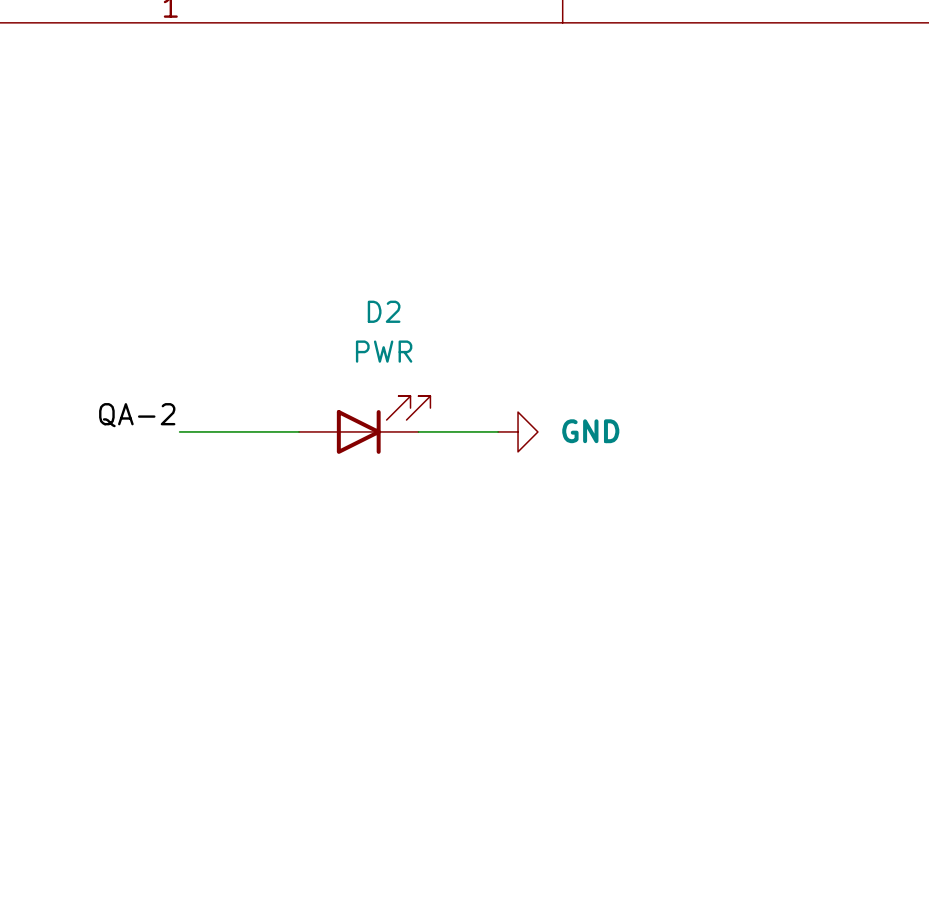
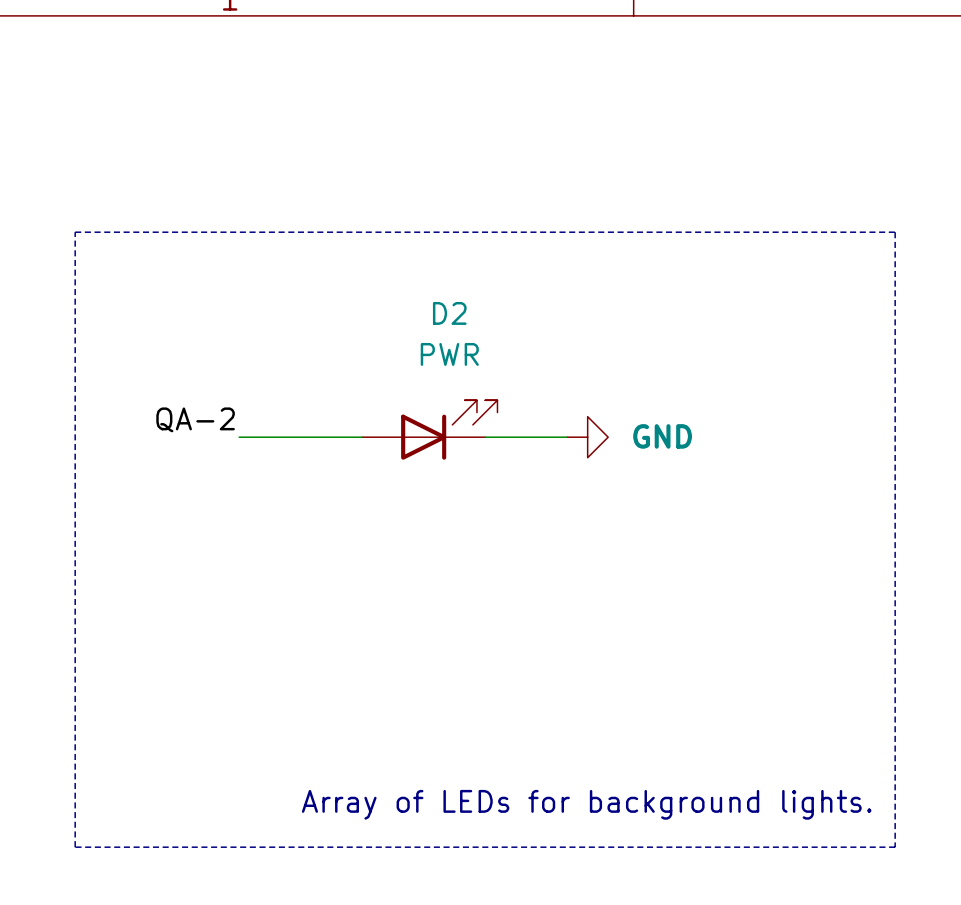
line: none -> (75, 232) (895, 232) (895, 847) (75, 847) (75, 232)
text: none -> Array of LEDs for background lights. (586, 804)

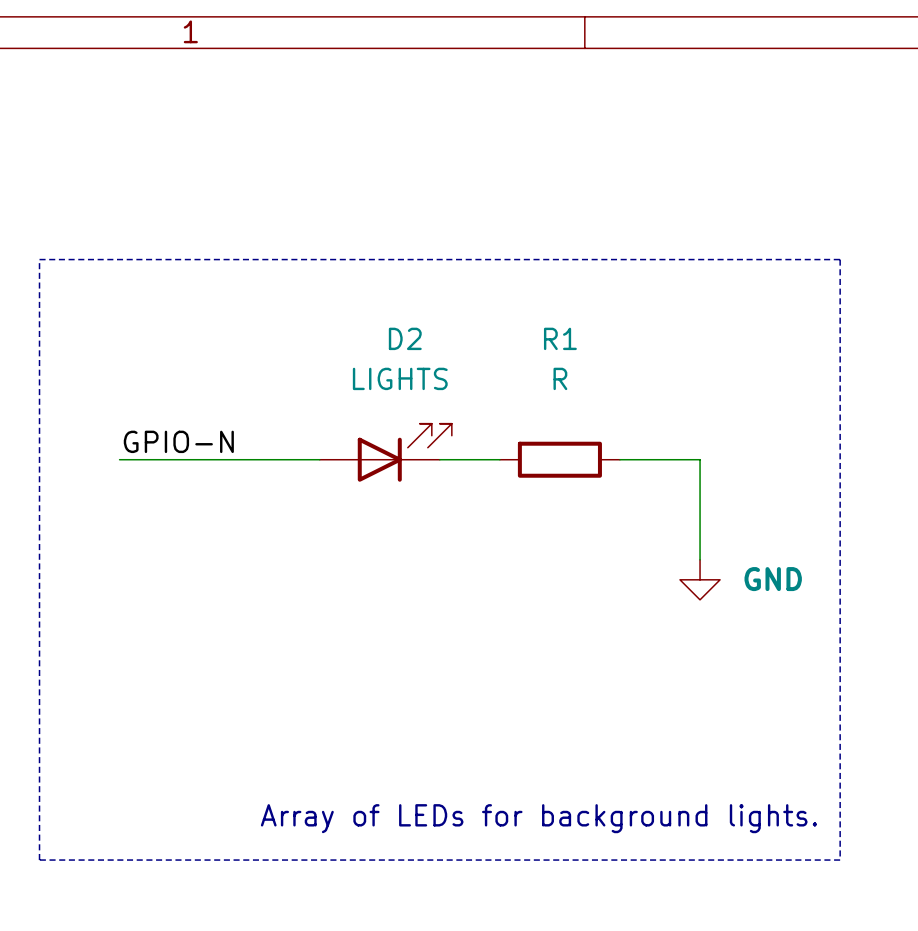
D2 value: PWR (449, 354) -> LIGHTS (400, 378)
label: none -> GPIO-N (178, 441)
label: QA-2 (195, 419) -> none
wire: none -> (119, 459) (199, 459)
power symbol rotation: 0° (587, 437) -> 90° clockwise (700, 579)
power symbol position: GND (587, 437) -> GND (700, 579)
R1: none -> R (559, 459)
wire: none -> (619, 459) (700, 459) (700, 559)

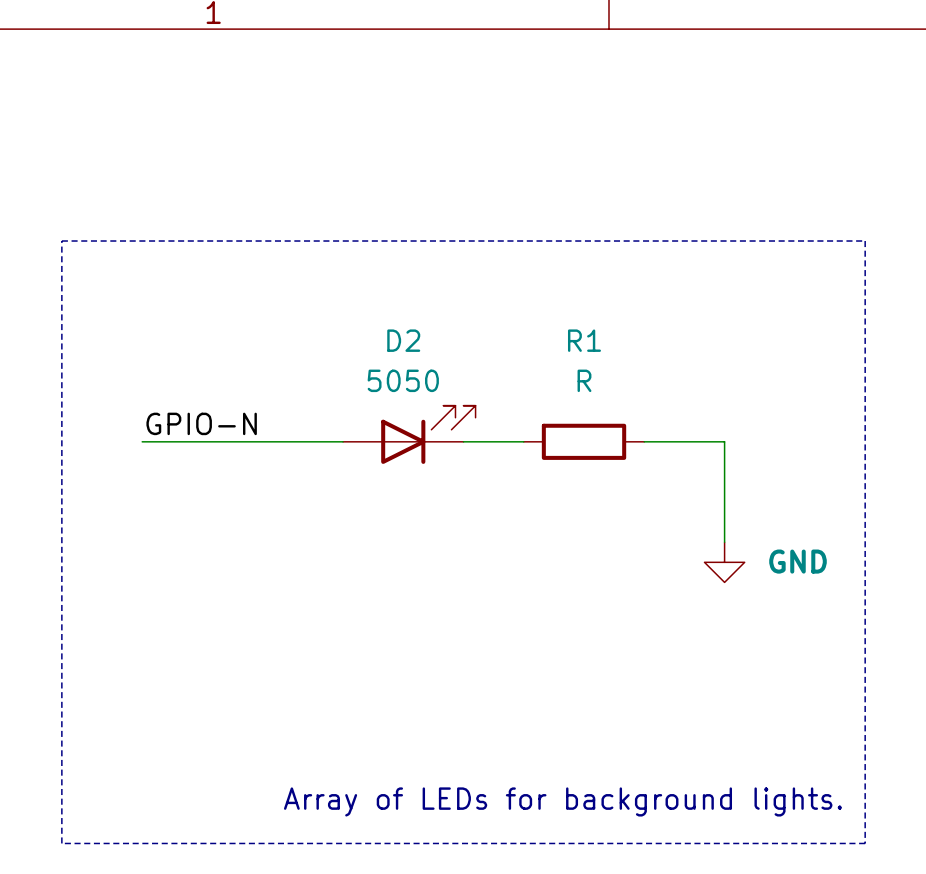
D2 name position: D2 (405, 338) -> D2 (403, 340)
R1 name position: R1 (560, 338) -> R1 (584, 340)
D2 value: LIGHTS (400, 378) -> 5050 (403, 380)
R1 value position: R (560, 378) -> R (584, 380)

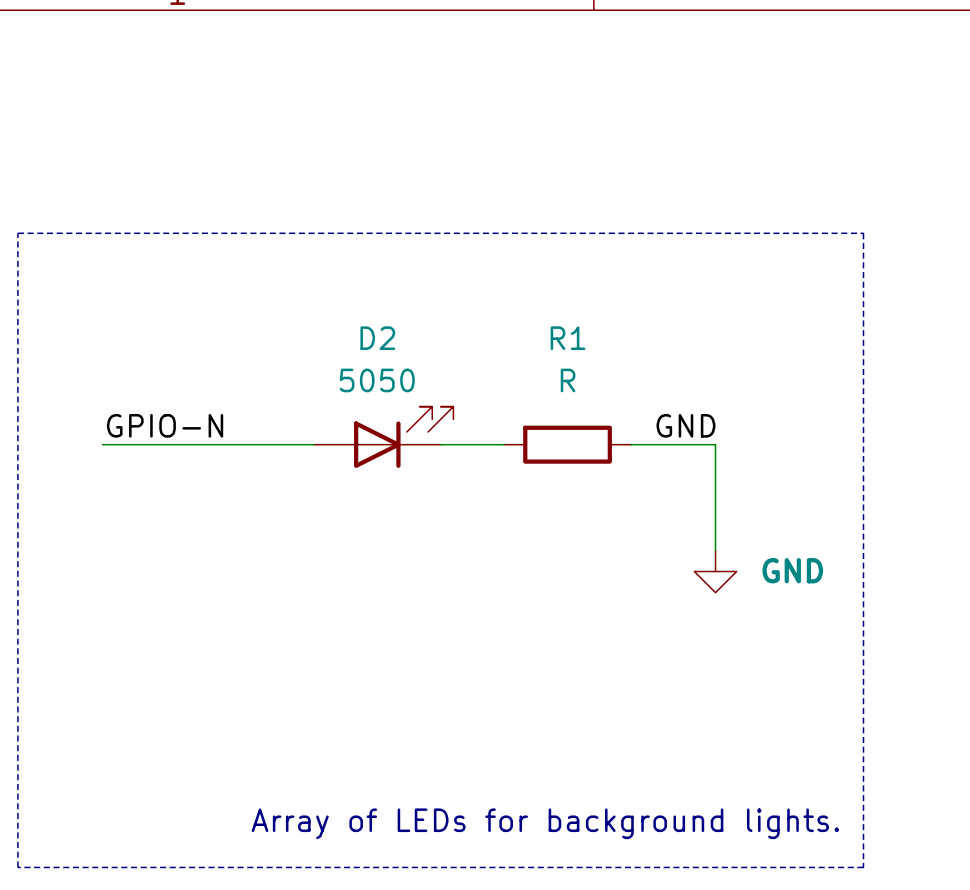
label: none -> GND (685, 425)

